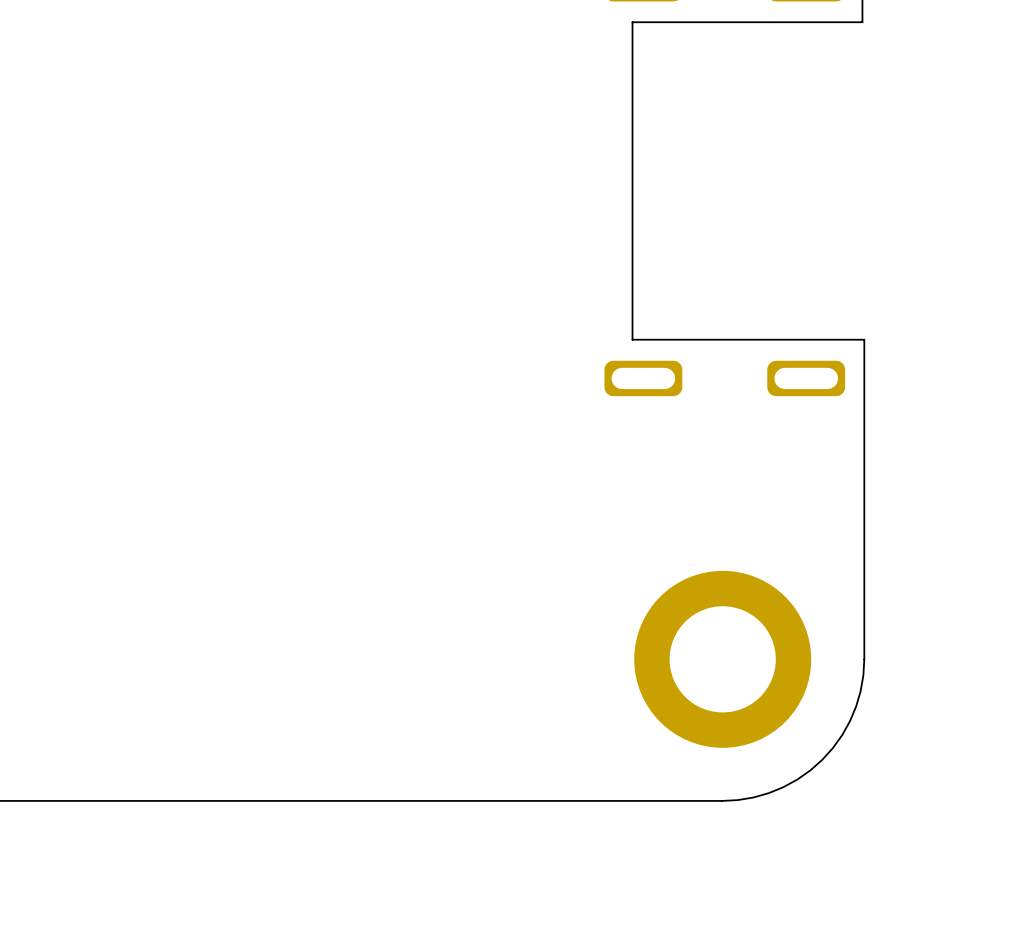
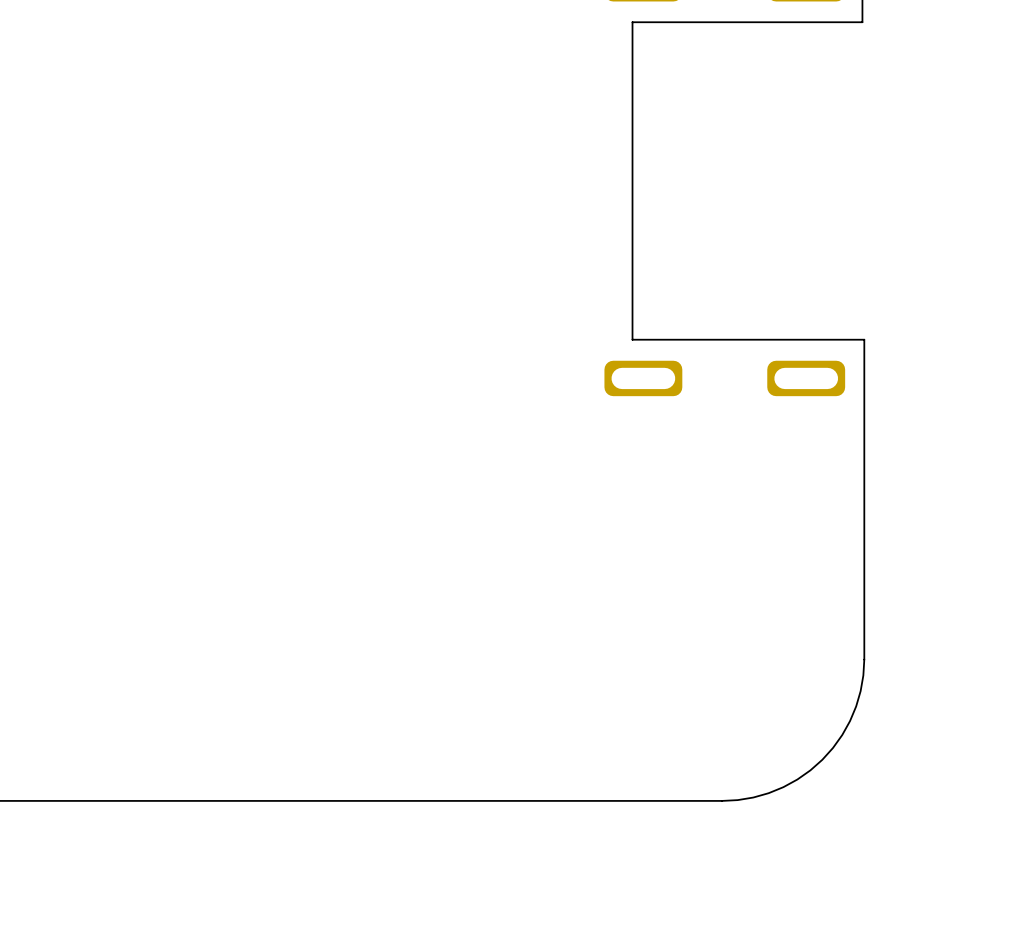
part: (722, 659) -> none

